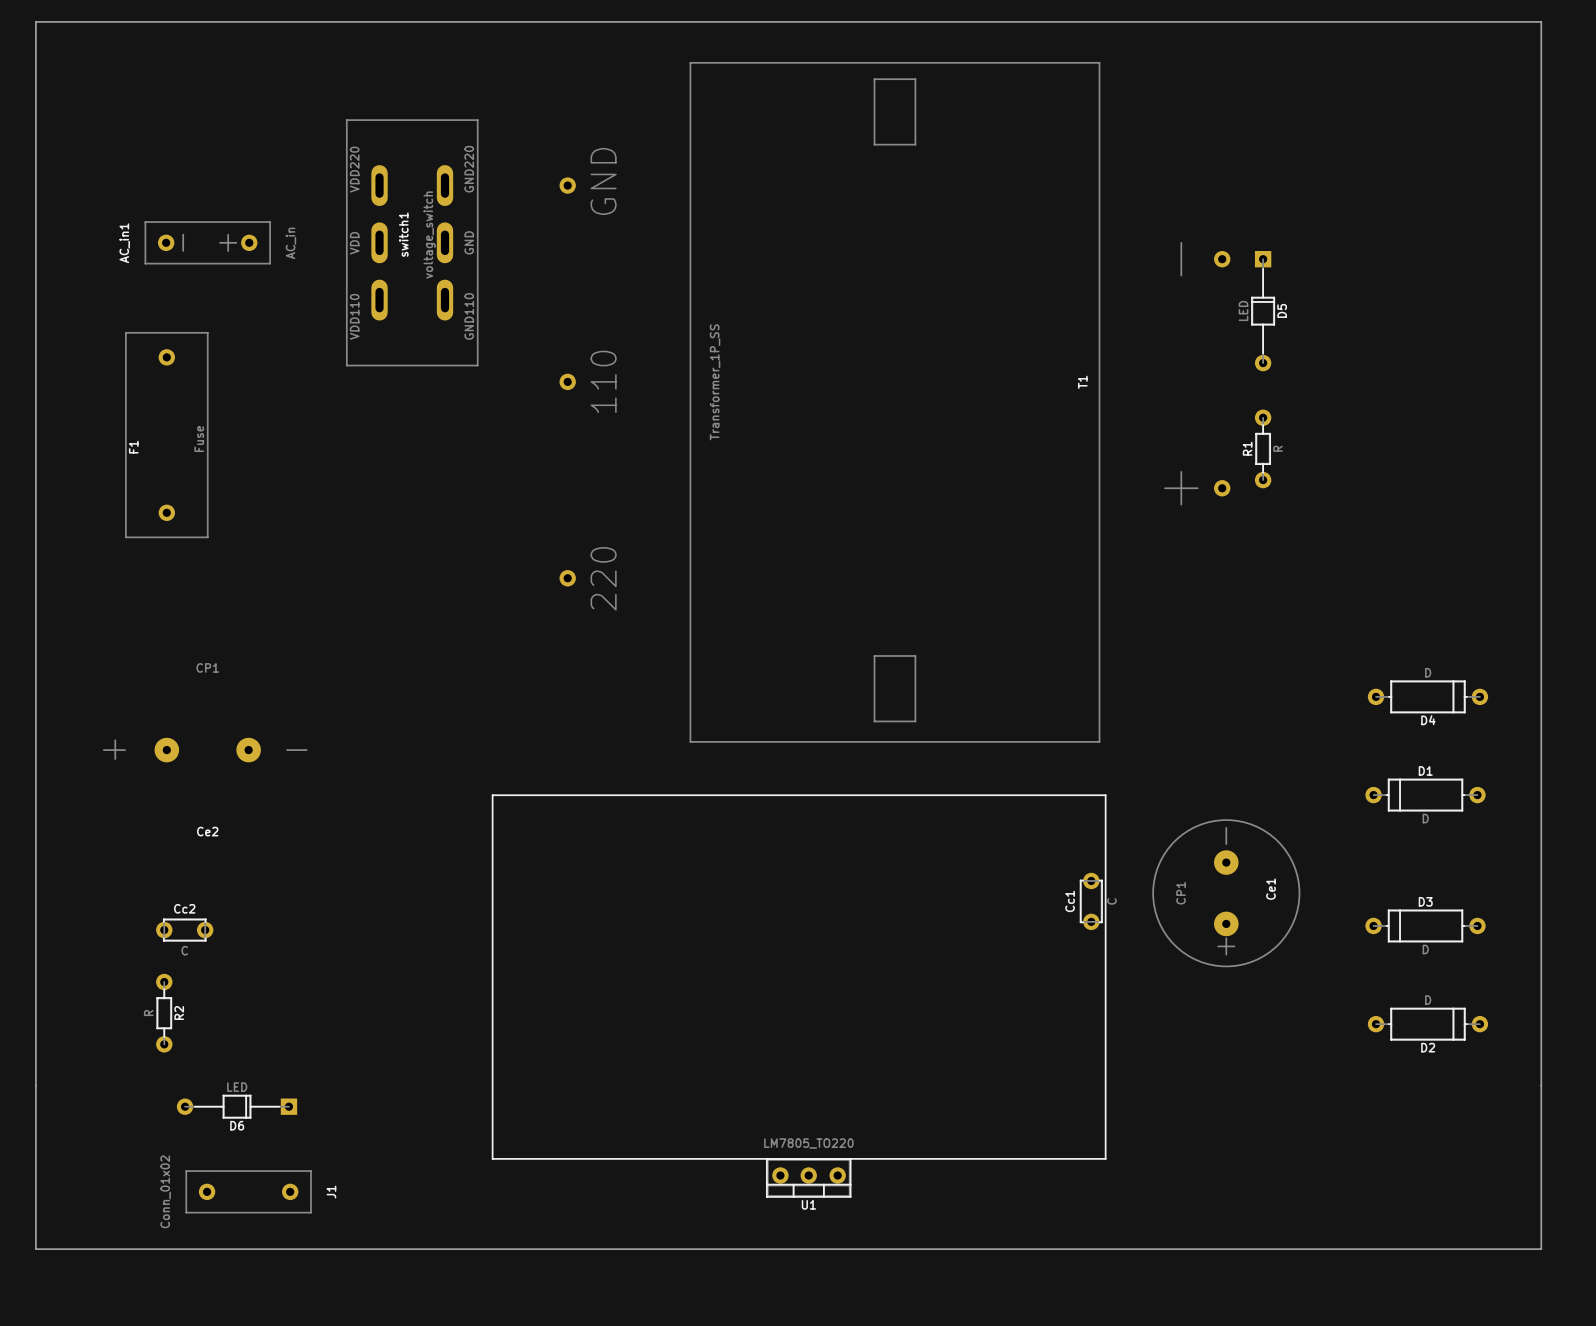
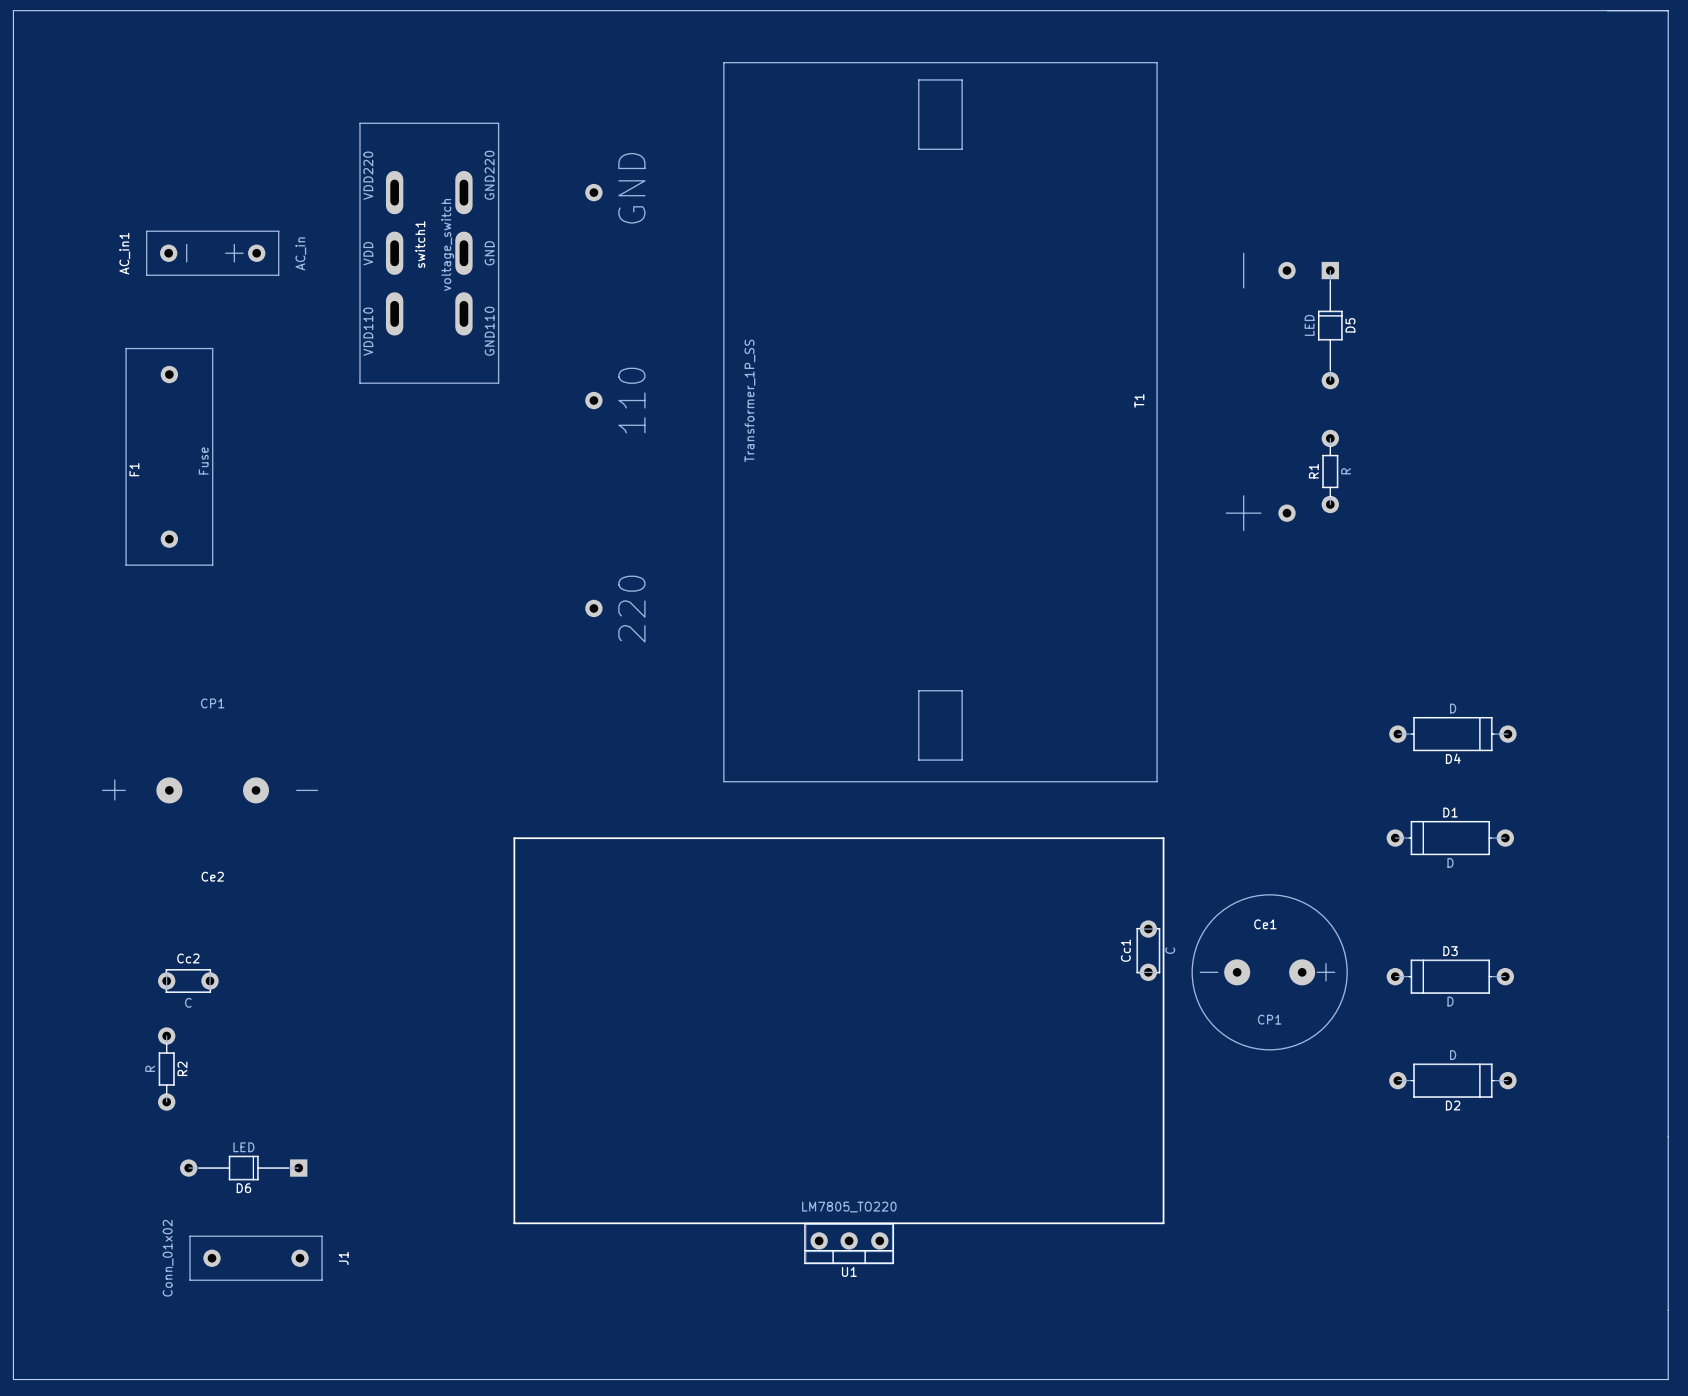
board edge: (35, 21) (35, 1249) (1541, 1249) (1541, 21) (35, 21) -> (13, 10) (13, 1379) (1668, 1379) (1668, 10) (13, 10)
D4 position: (1427, 696) -> (1452, 734)
D1 position: (1425, 795) -> (1450, 838)
Ce1 rotation: 0° (1226, 893) -> 90° counterclockwise (1269, 972)
D3 position: (1425, 925) -> (1450, 976)
D2 position: (1427, 1024) -> (1452, 1080)

